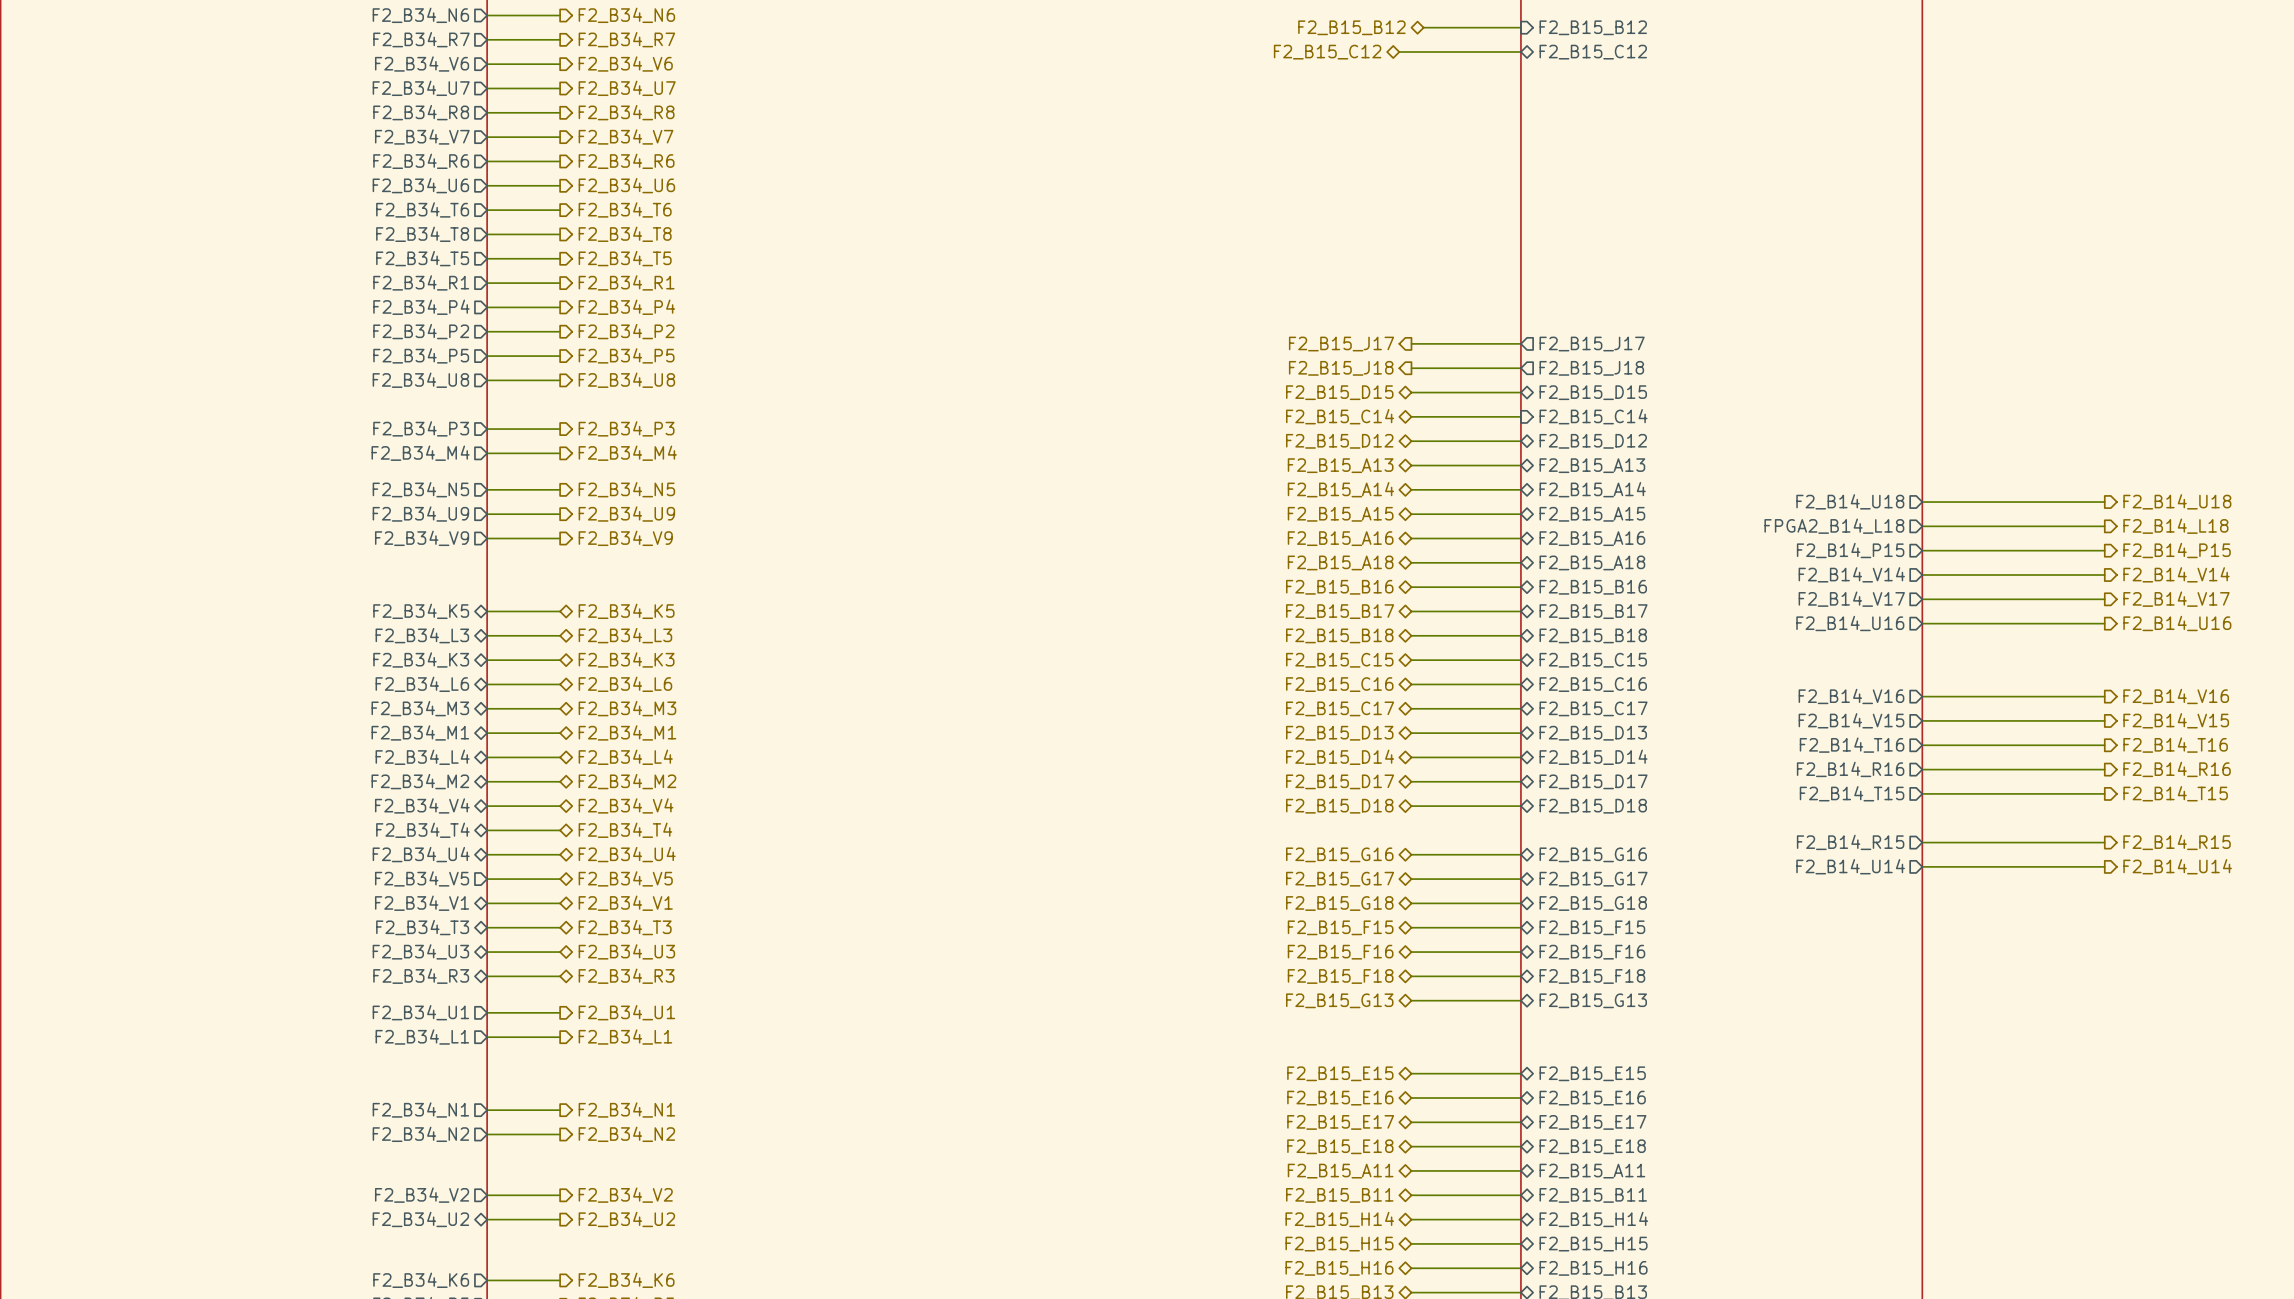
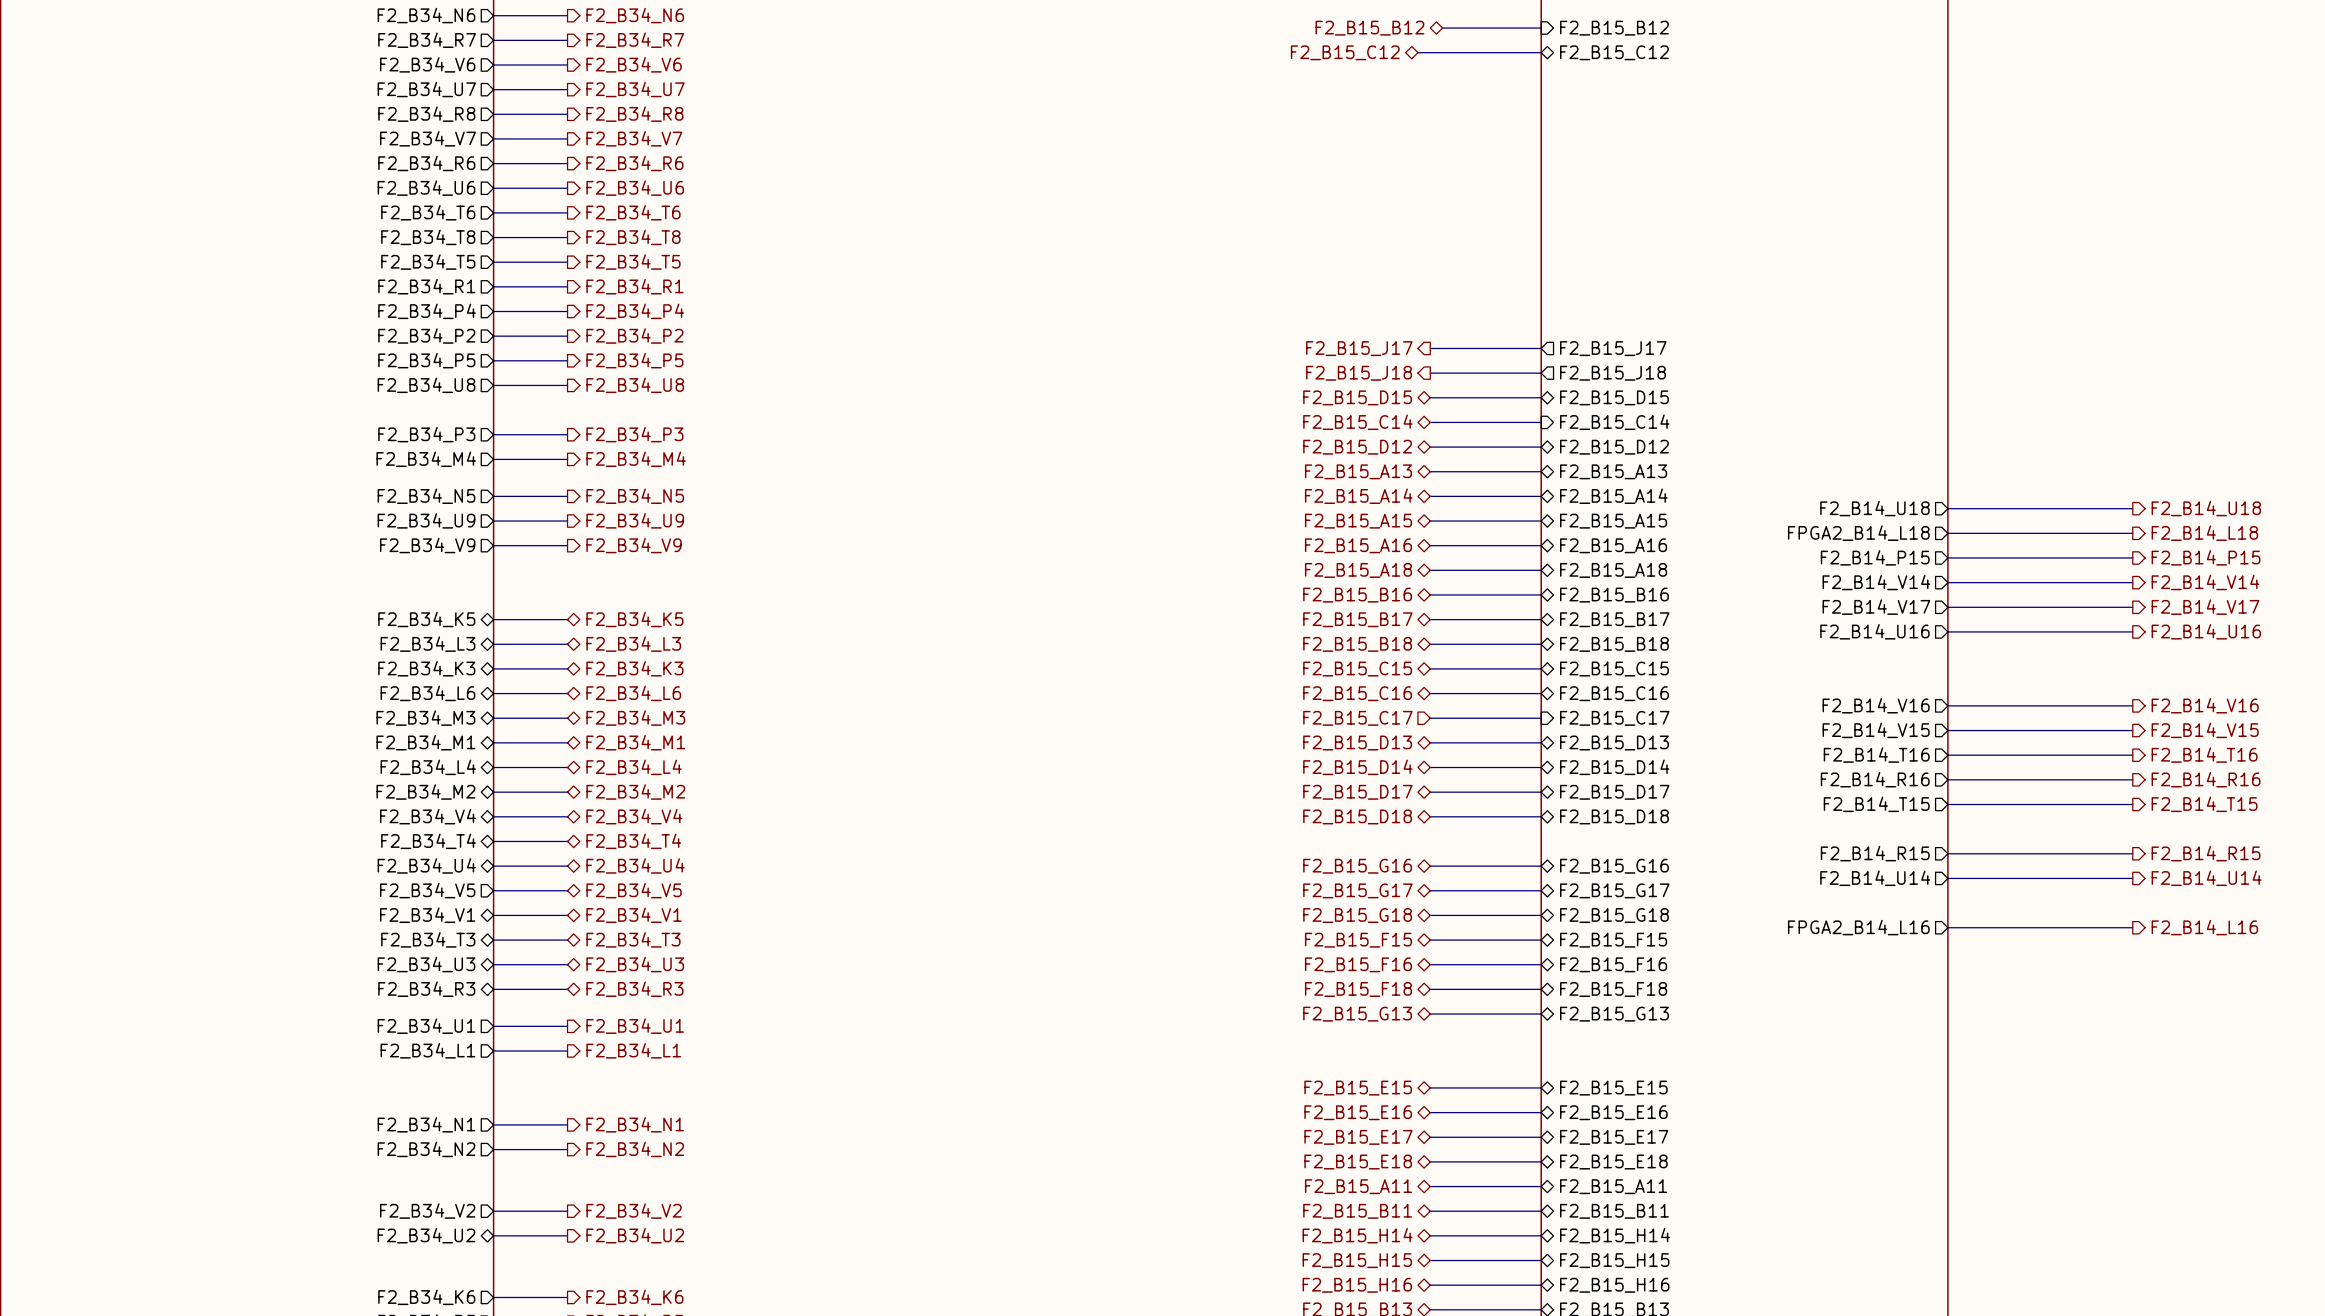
hierarchical label shape: bidirectional (1340, 708) -> input (1357, 718)
sheet pin shape: bidirectional (1593, 708) -> input (1614, 718)
sheet pin: none -> FPGA2_B14_L16 (1858, 927)
wire: none -> (1947, 927) (2132, 927)
hierarchical label: none -> F2_B14_L16 (2204, 927)

